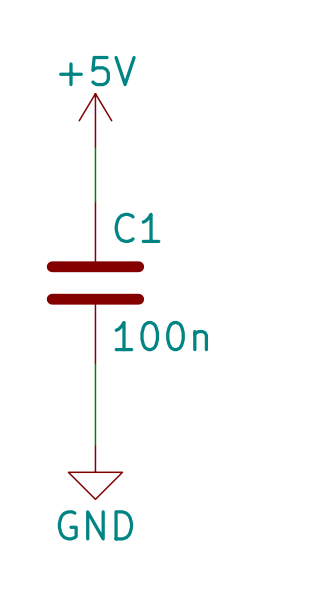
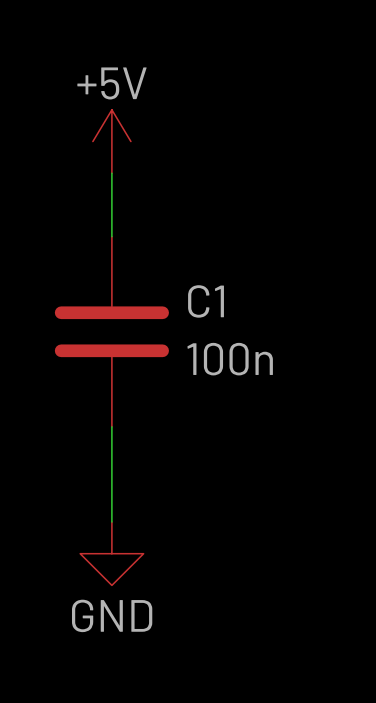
C1 name position: C1 (137, 227) -> C1 (206, 301)
C1 value position: 100n (161, 336) -> 100n (230, 359)

